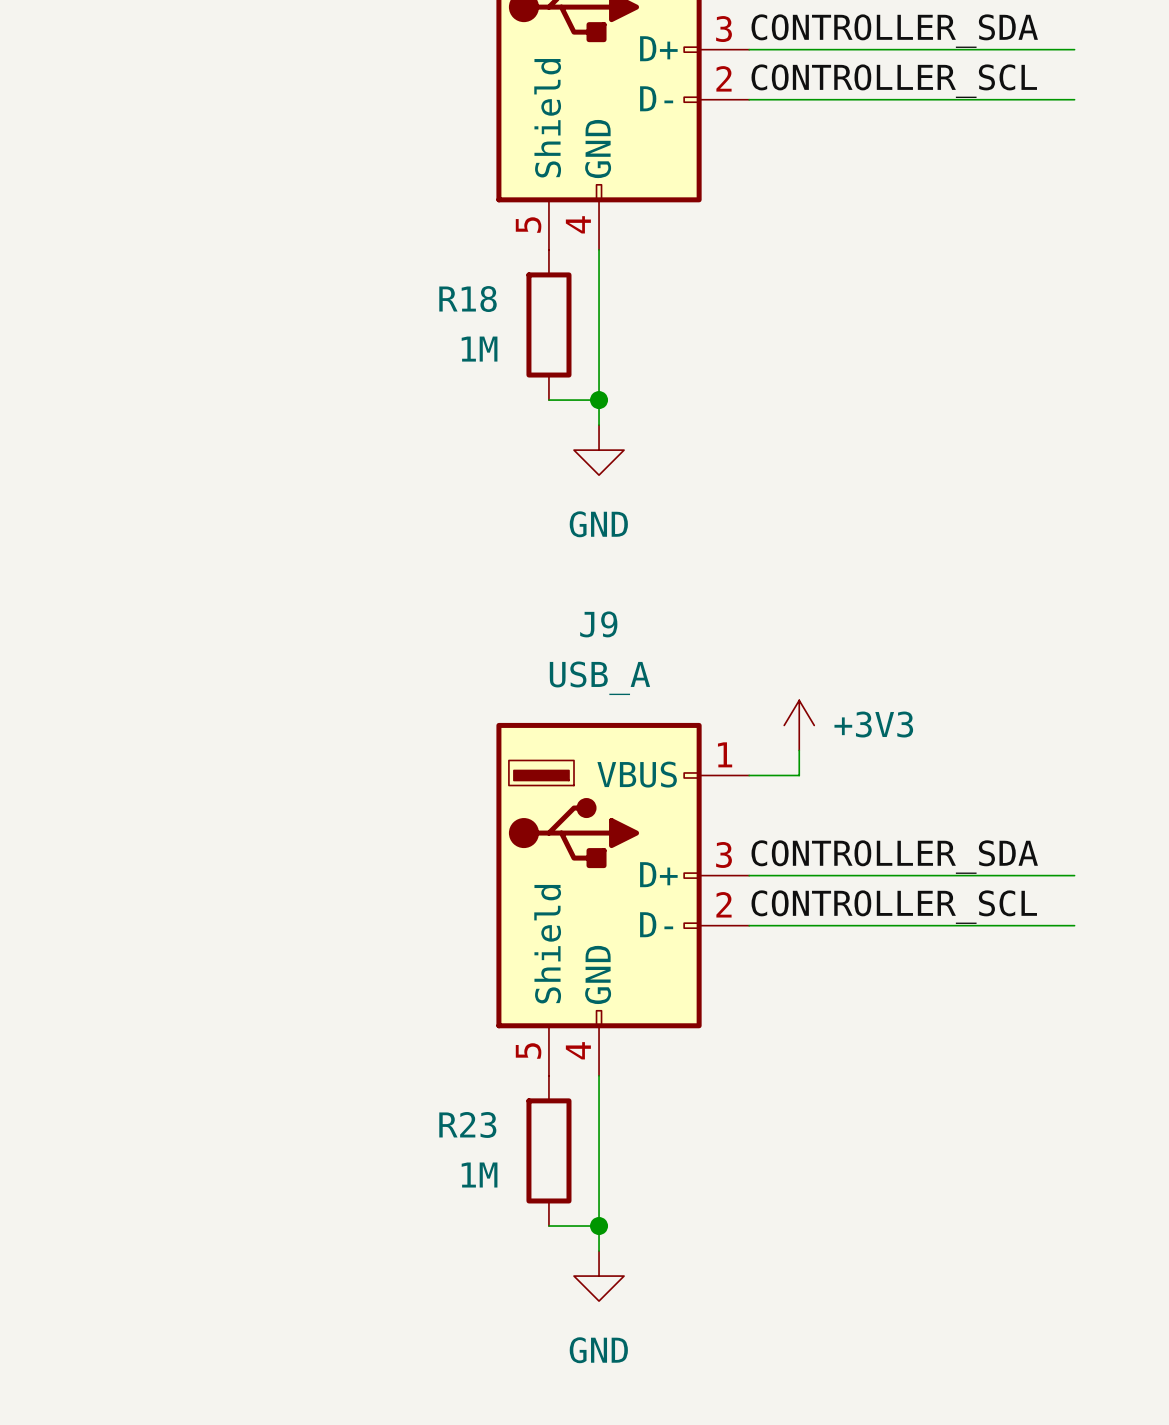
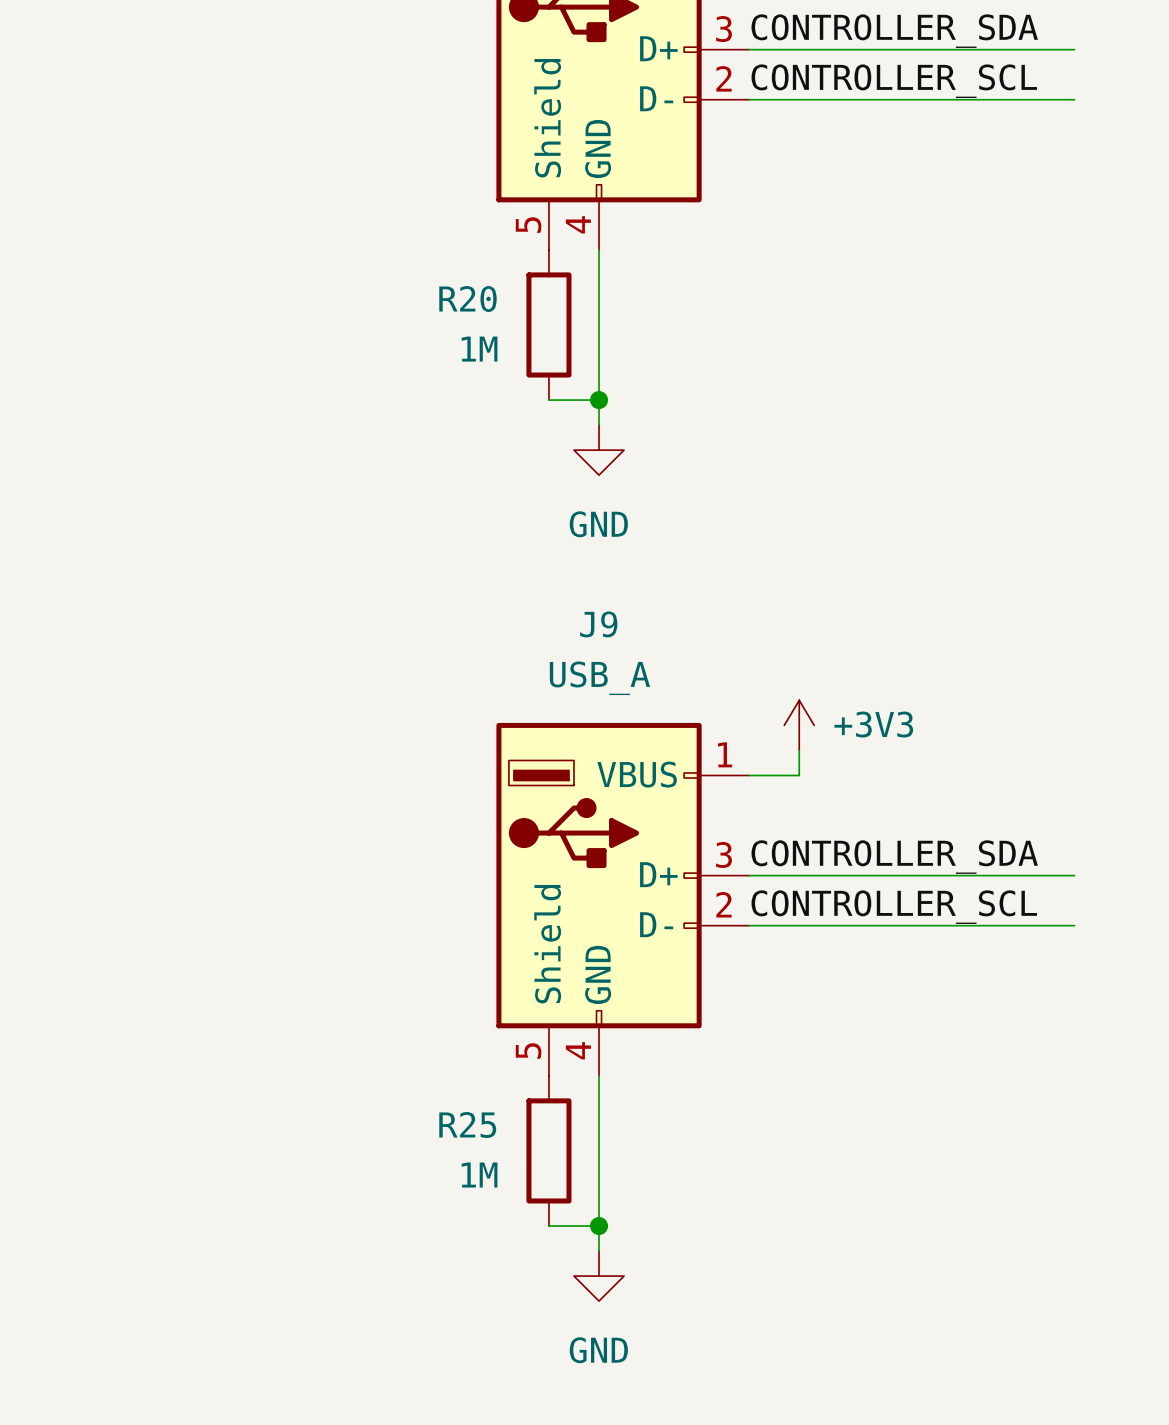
R18 name: R18 (468, 299) -> R20 (467, 299)
R23 name: R23 (467, 1124) -> R25 (467, 1124)

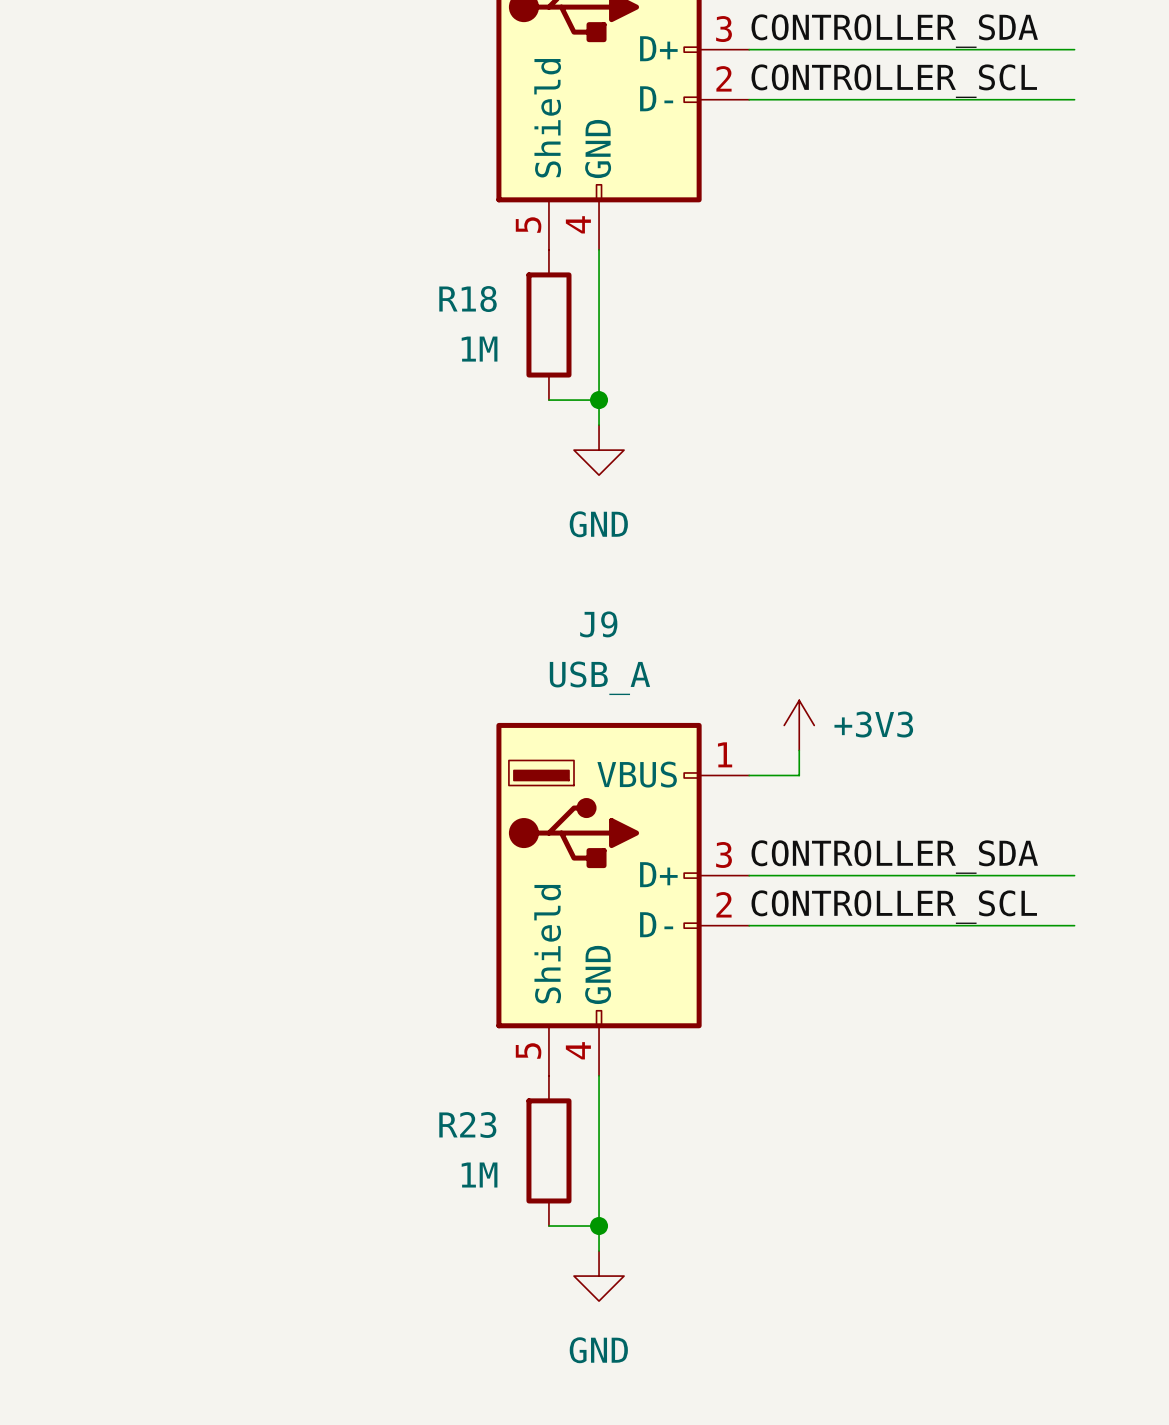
R20 name: R20 (467, 299) -> R18 (468, 299)
R25 name: R25 (467, 1124) -> R23 (467, 1124)

